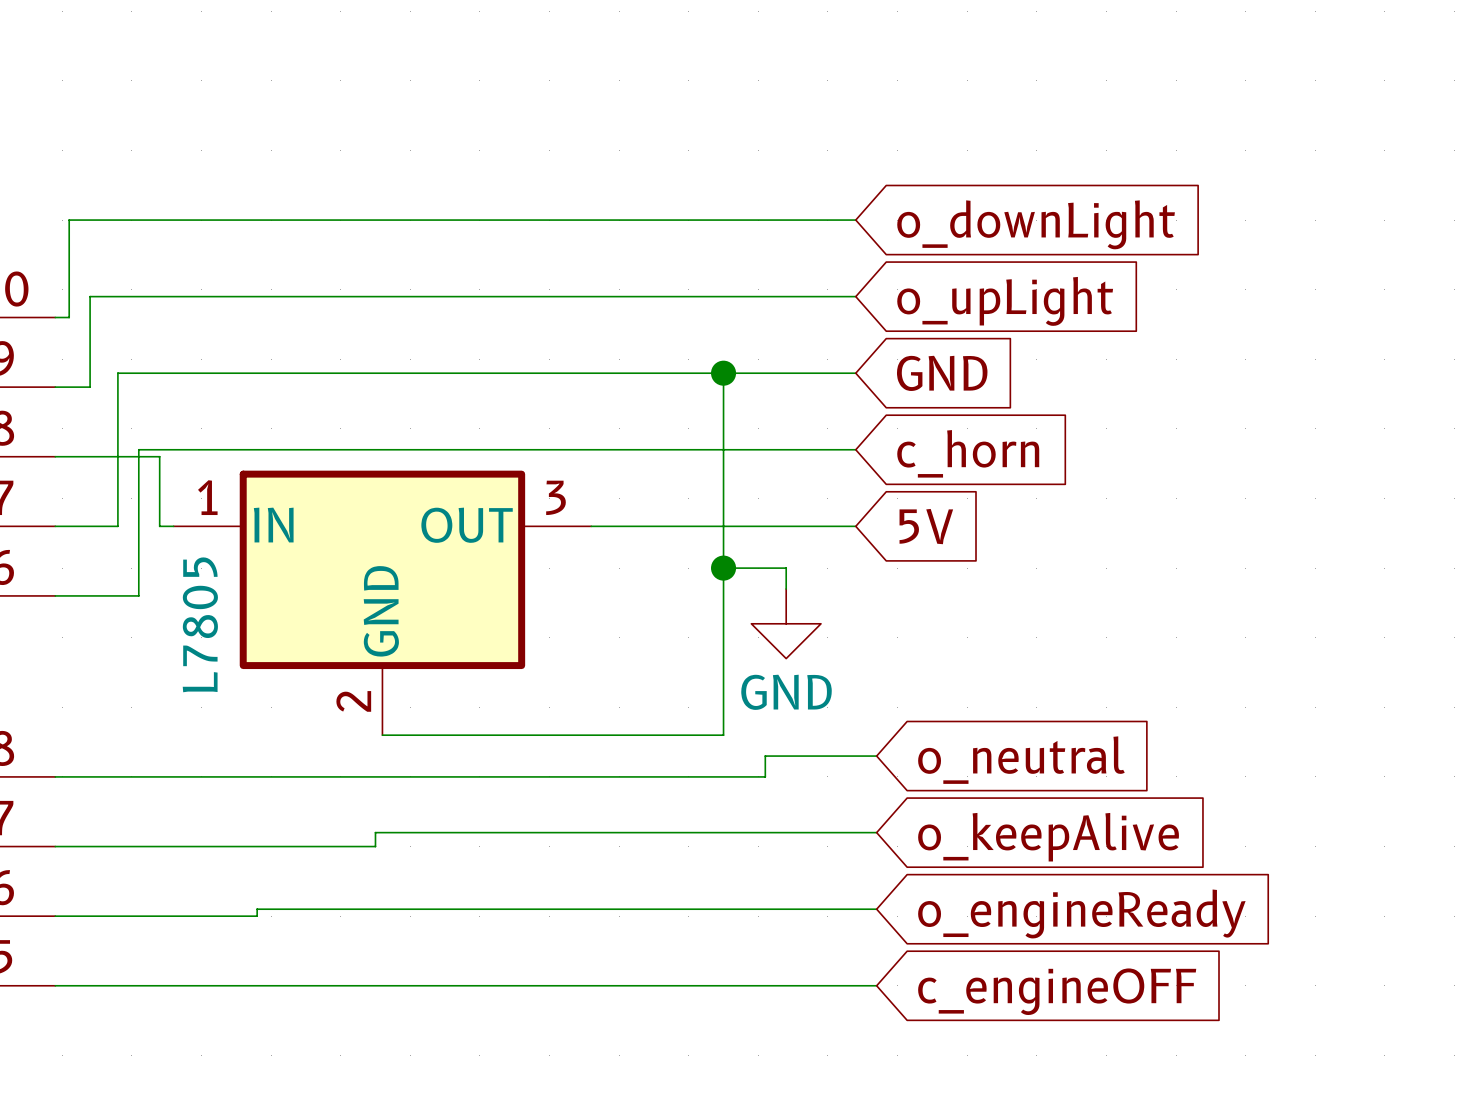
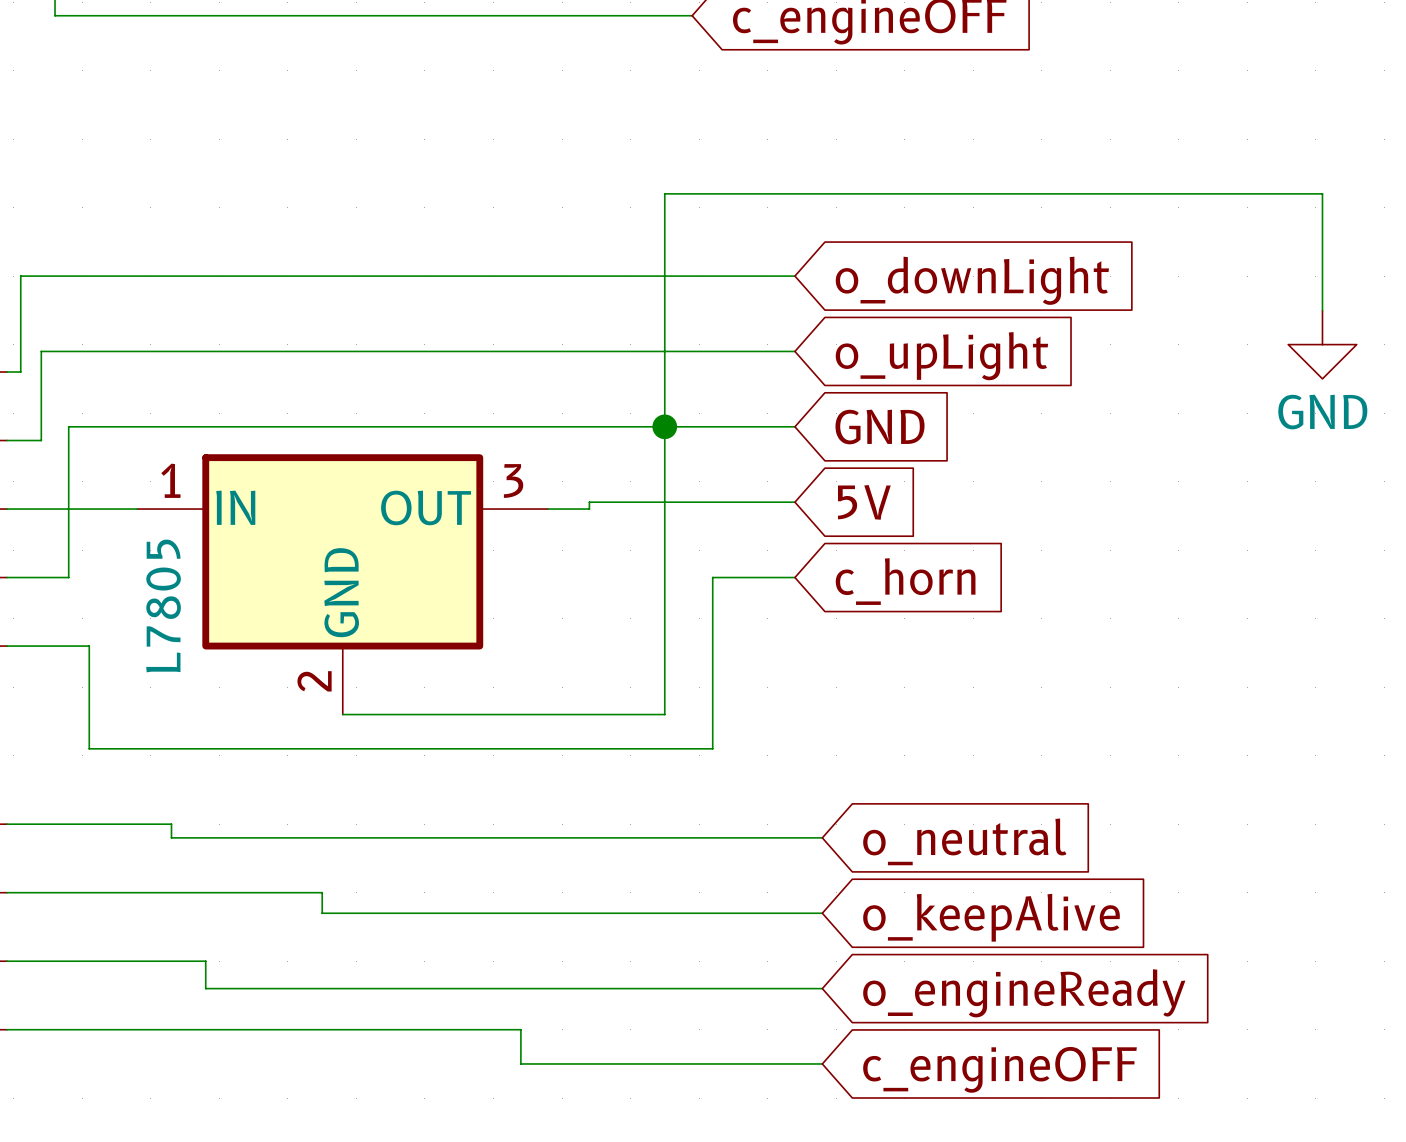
wire: none -> (1322, 310) (1322, 193) (664, 193) (664, 426)
power symbol: none -> GND (1322, 344)
wire: (646, 449) (138, 449) (138, 595) -> (712, 577) (712, 748) (89, 748) (89, 646)
wire: none -> (589, 502) (589, 509) (548, 509)
global label: c_horn (968, 453) -> 5V (864, 502)
wire: (159, 456) (159, 526) (173, 526) -> (109, 509) (137, 509)
wire: (591, 526) (772, 526) -> none
global label: 5V (926, 526) -> c_horn (905, 581)
wire: (723, 568) (786, 568) (786, 588) -> none
junction: (723, 568) -> none
part position: (382, 602) -> (342, 584)
power symbol: GND (786, 623) -> none
wire: (723, 665) (723, 735) (382, 735) -> (664, 714) (342, 714)
wire: (876, 756) (765, 756) (765, 776) (222, 776) -> (822, 837) (171, 837) (171, 824)
global label position: o_neutral (1021, 760) -> o_neutral (964, 841)
wire: (876, 832) (375, 832) (375, 846) -> (822, 913) (322, 913) (322, 892)
global label position: o_keepAlive (1048, 837) -> o_keepAlive (991, 917)
wire: (876, 909) (257, 909) (257, 916) -> (822, 988) (205, 988) (205, 961)
global label position: o_engineReady (1081, 913) -> o_engineReady (1024, 993)
wire: (577, 985) (876, 985) -> (520, 1029) (520, 1063) (822, 1063)
global label position: c_engineOFF (1057, 991) -> c_engineOFF (999, 1069)

